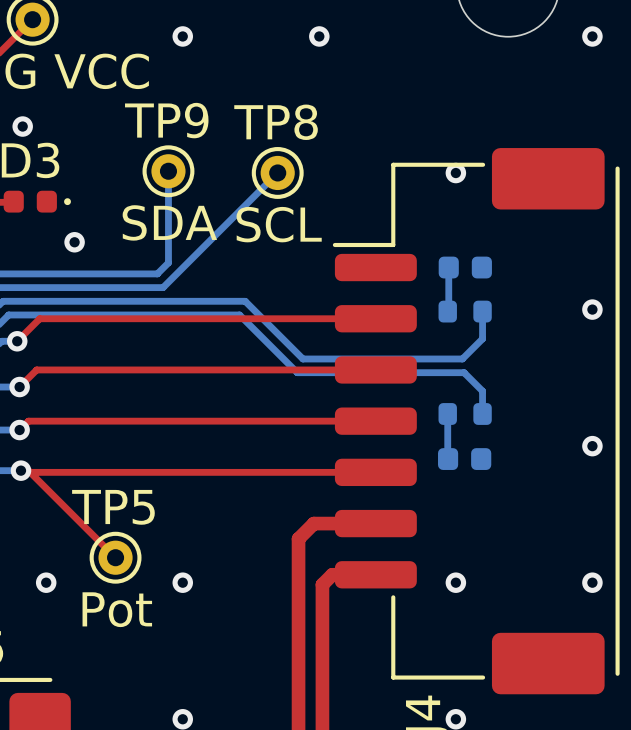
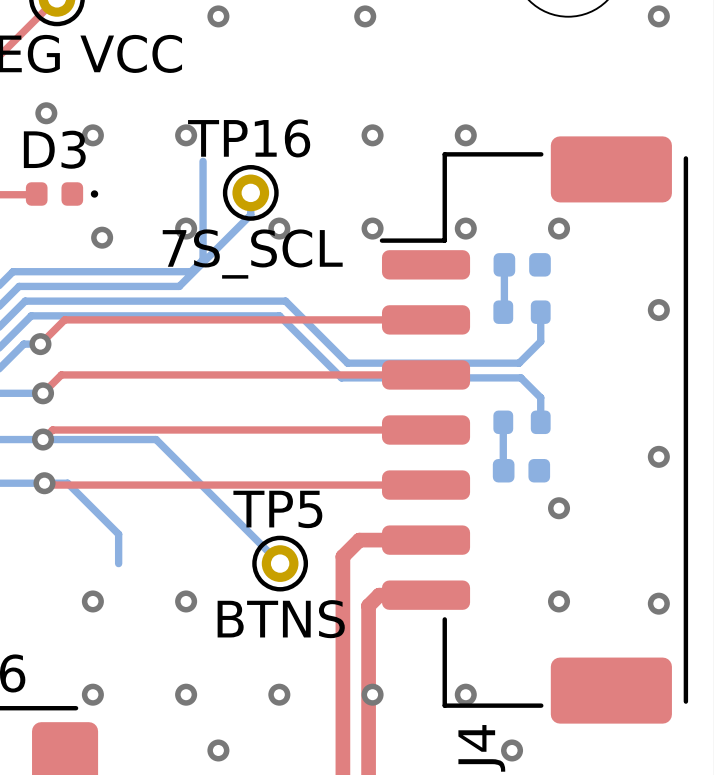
via: none -> (92, 135)
via: none -> (186, 135)
via: none -> (372, 135)
via: none -> (465, 135)
TP9: SDA (168, 171) -> none
bottom track: (277, 172) (163, 287) (146, 287) -> (250, 192) (250, 214) (179, 286)
TP8: SCL (277, 172) -> none
via: (455, 173) -> none
TP16: none -> 7S_SCL (250, 192)
via: none -> (186, 228)
via: none -> (279, 228)
via: none -> (372, 228)
via: none -> (465, 228)
via: none -> (559, 228)
bottom track: none -> (43, 439) (156, 439) (280, 563)
bottom track: none -> (44, 483) (67, 483) (118, 534) (118, 563)
top track: (28, 470) (115, 557) -> none
via: none -> (559, 508)
TP5 position: (115, 557) -> (280, 563)
via position: (46, 582) -> (92, 601)
via position: (182, 582) -> (186, 601)
via position: (455, 582) -> (559, 601)
TP5 value: Pot (117, 609) -> BTNS (281, 619)
via: none -> (92, 694)
via: none -> (186, 694)
via: none -> (279, 694)
via: none -> (372, 694)
via: none -> (465, 694)

